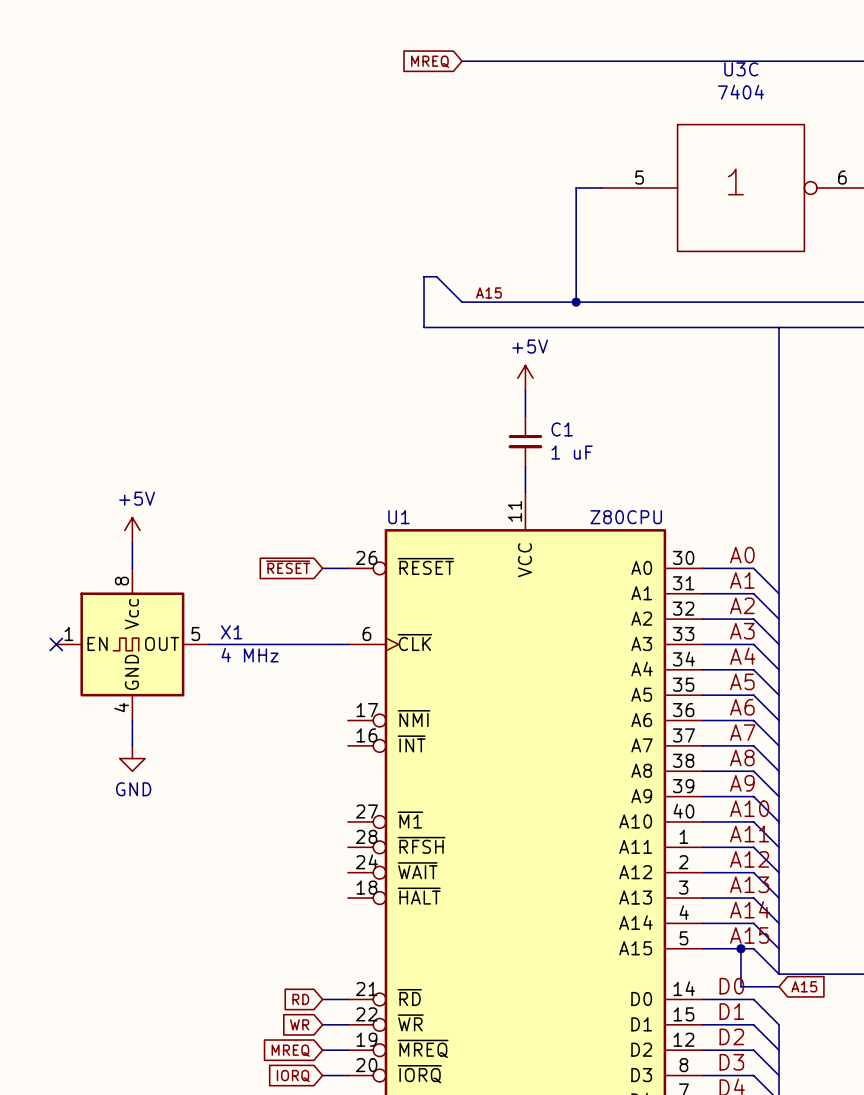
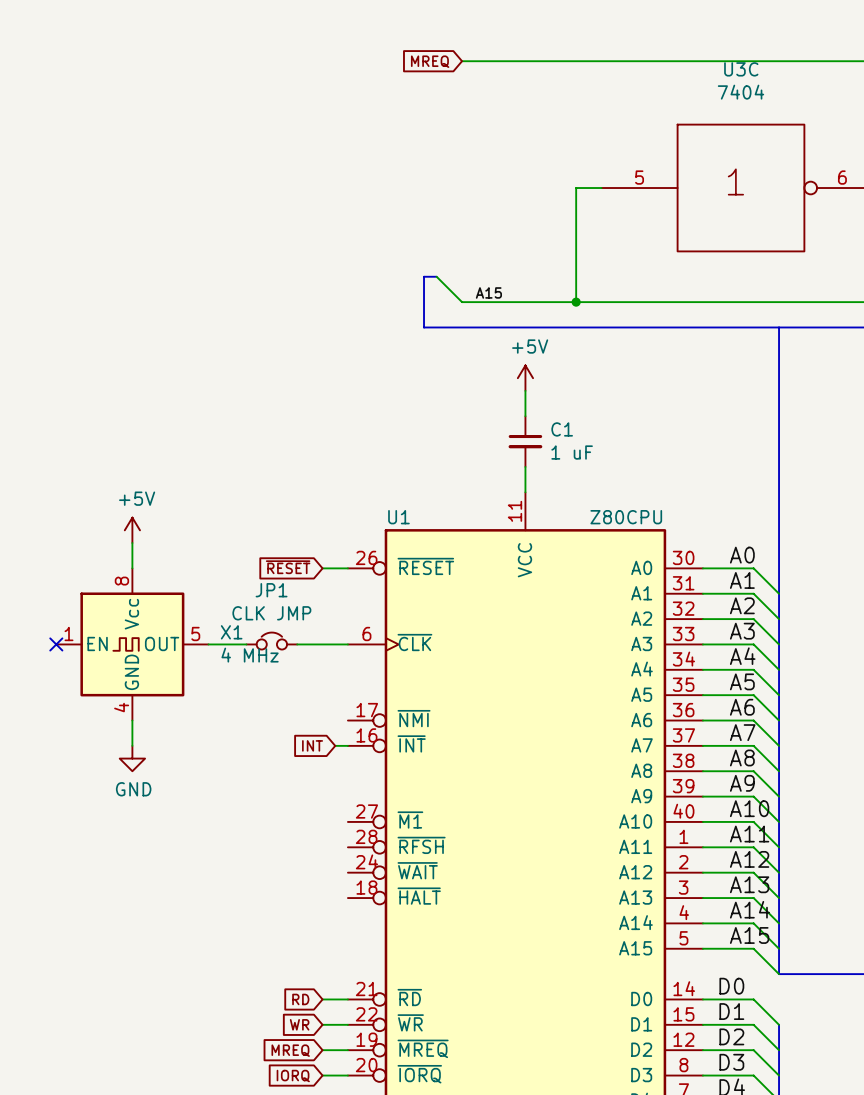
JP1: none -> CLK JMP (271, 641)
wire: (246, 644) (297, 644) -> none
global label: none -> INT (312, 745)
wire: none -> (335, 745) (347, 745)
wire: (740, 948) (740, 986) (779, 986) -> none
junction: (740, 948) -> none
global label: A15 (804, 986) -> none

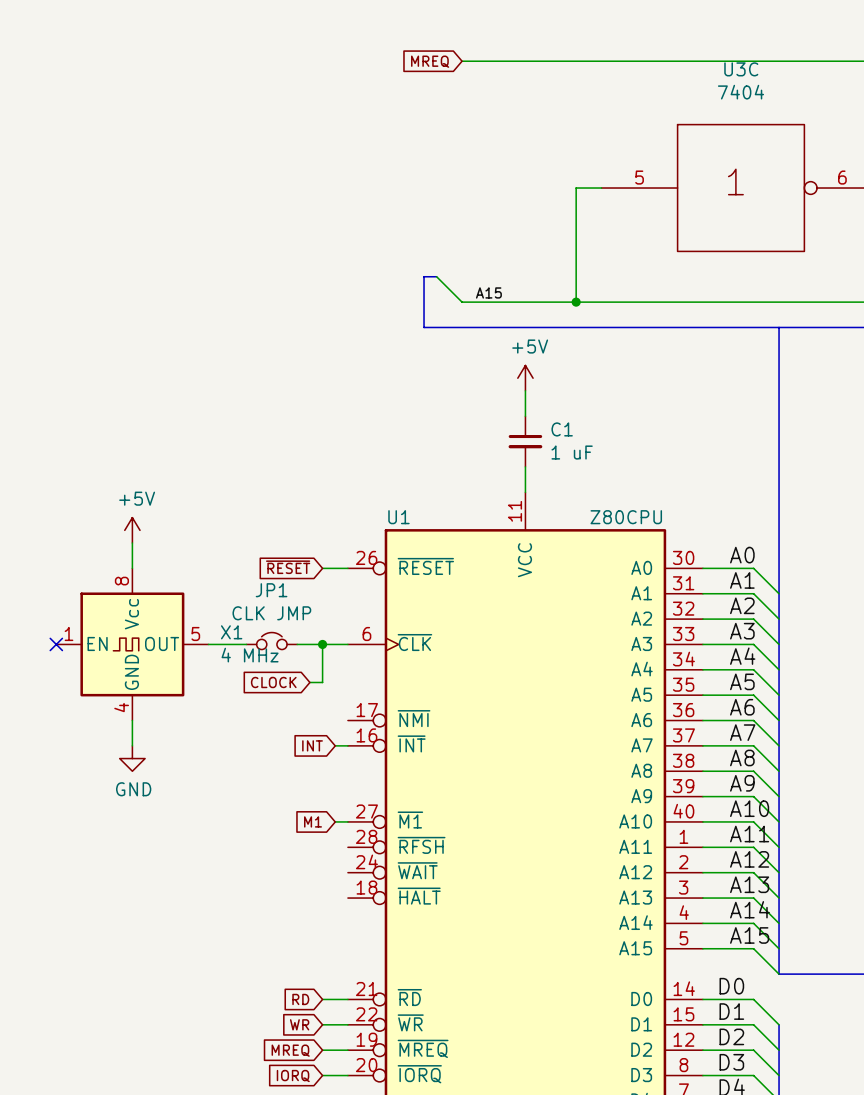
wire: none -> (322, 644) (322, 682) (309, 682)
junction: none -> (322, 644)
global label: none -> CLOCK (273, 682)
global label: none -> M1 (313, 821)
wire: none -> (335, 821) (347, 821)

